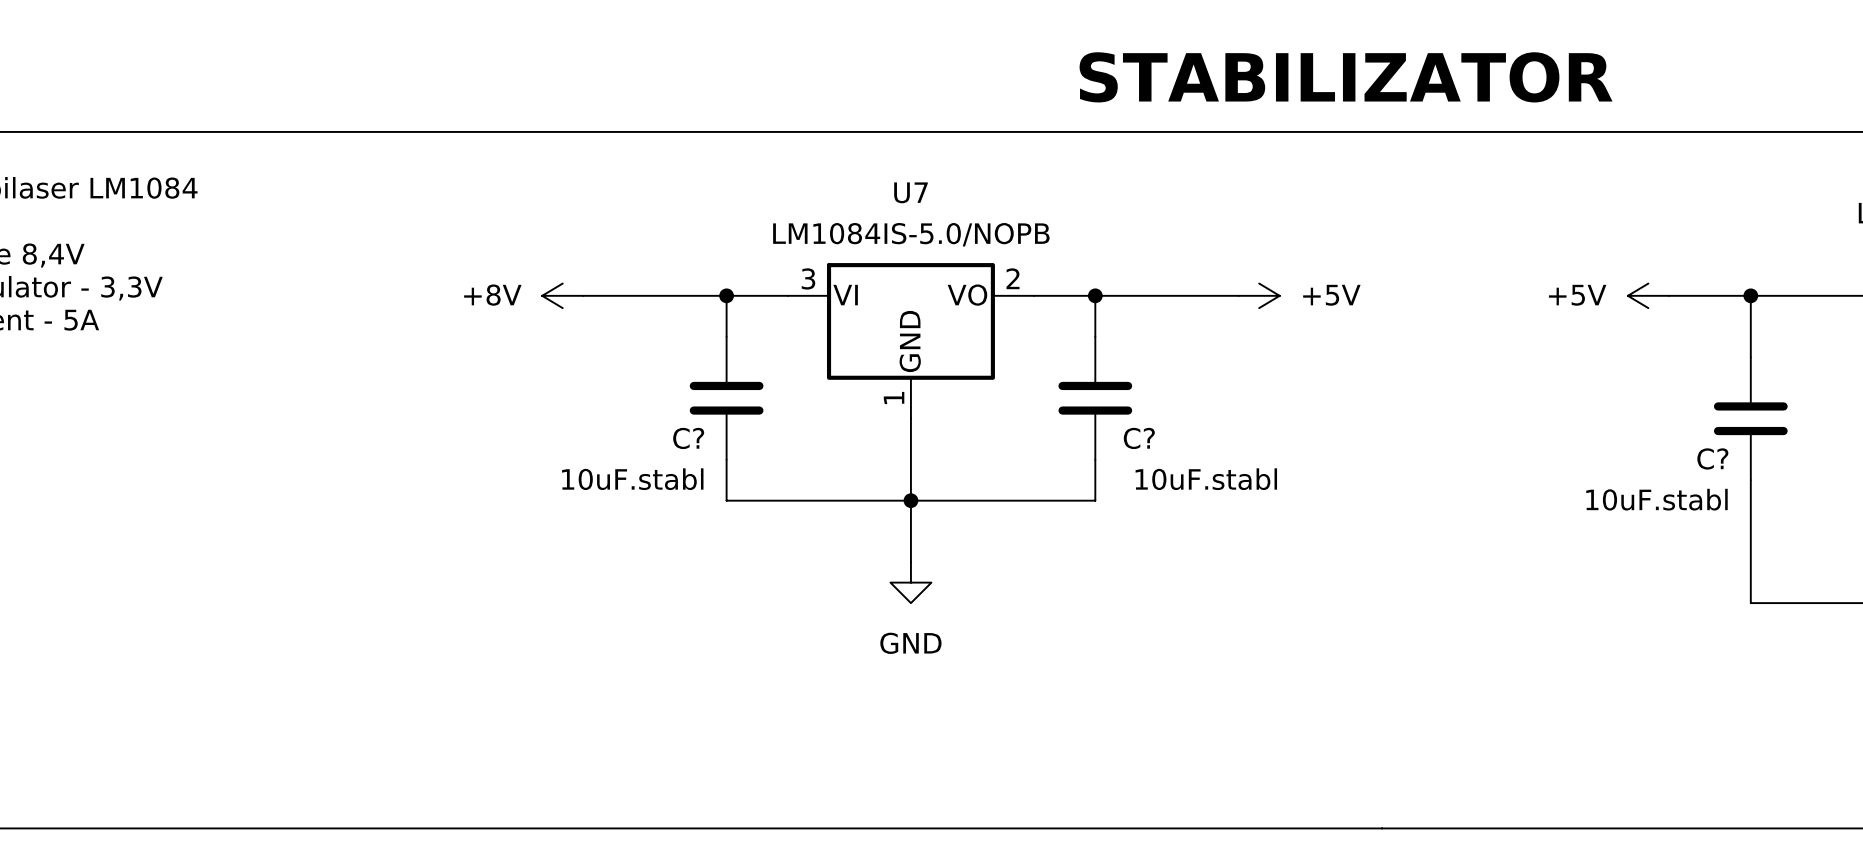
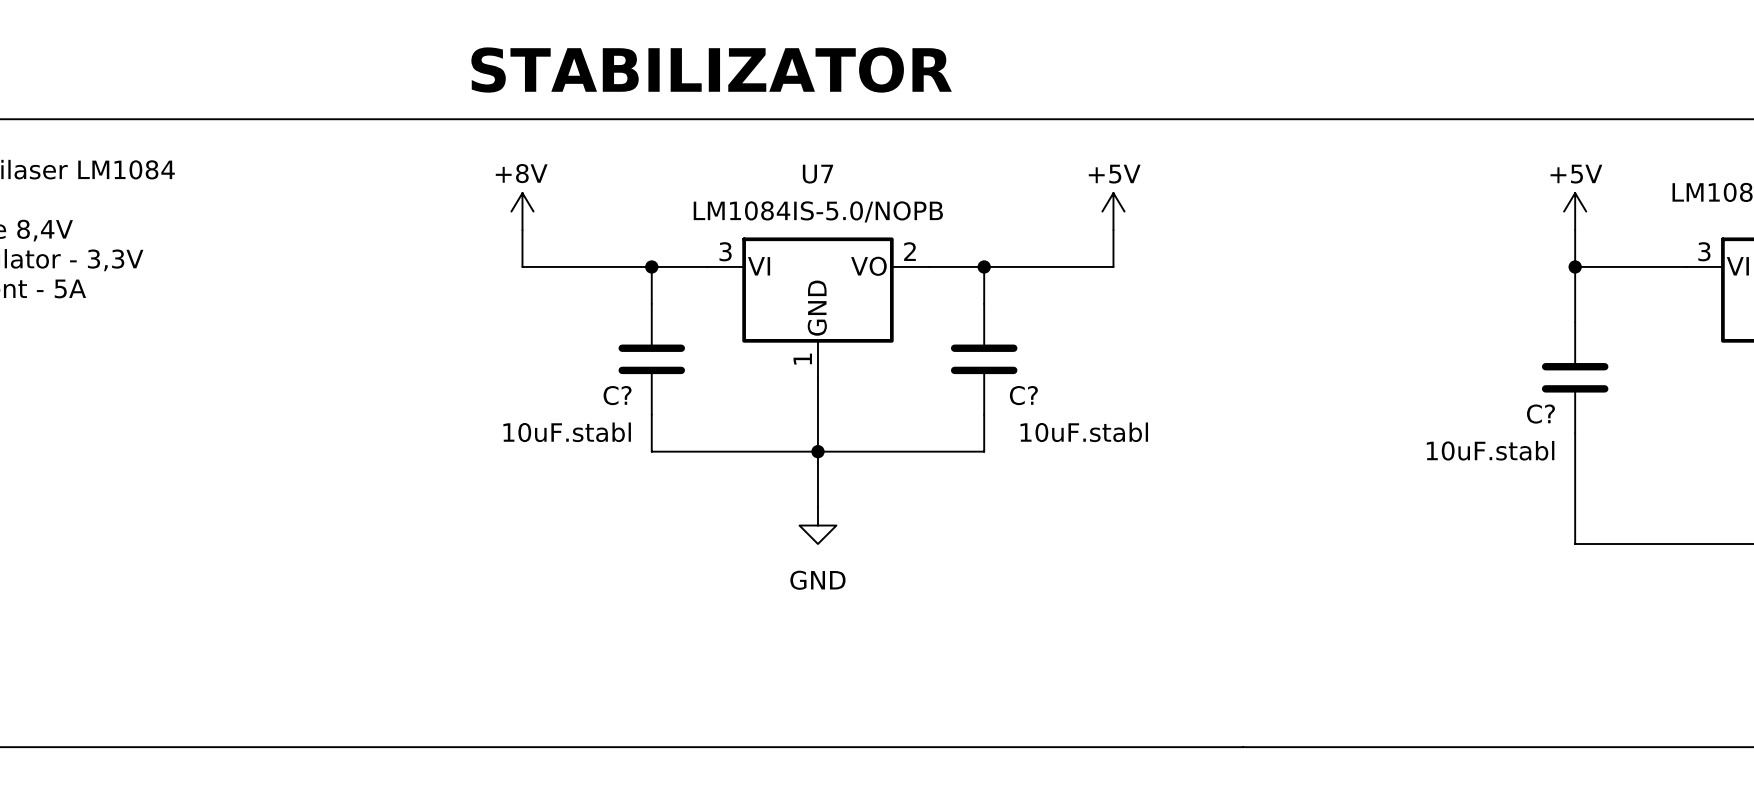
text: none -> STABILIZATOR (711, 70)
text: STABILIZATOR (1346, 77) -> none
wire: none -> (522, 230) (522, 266)
wire: none -> (1113, 230) (1113, 266)
power symbol text position: +8V (492, 295) -> +8V (521, 173)
power symbol rotation: 0° (562, 295) -> 90° clockwise (522, 211)
power symbol position: +8V (562, 295) -> +8V (522, 211)
power symbol rotation: 0° (1259, 295) -> 90° counterclockwise (1113, 211)
power symbol position: +5V (1259, 295) -> +5V (1113, 211)
power symbol text position: +5V (1331, 295) -> +5V (1114, 174)
power symbol rotation: 0° (1648, 295) -> 90° clockwise (1575, 211)
power symbol position: +5V (1648, 295) -> +5V (1575, 211)
wire: (1668, 295) (1750, 295) -> (1575, 230) (1575, 266)

